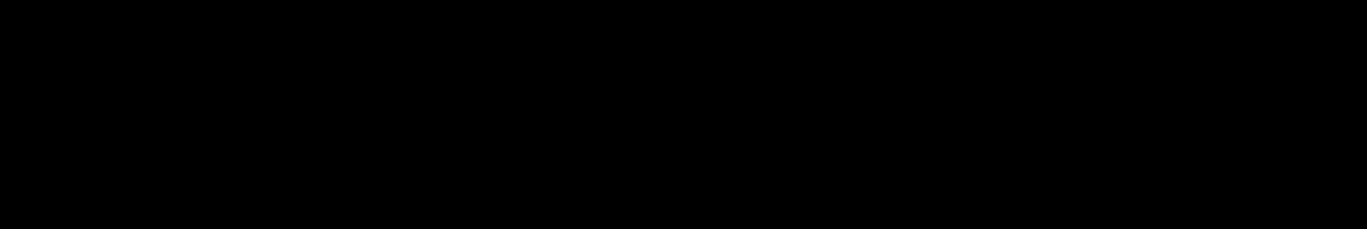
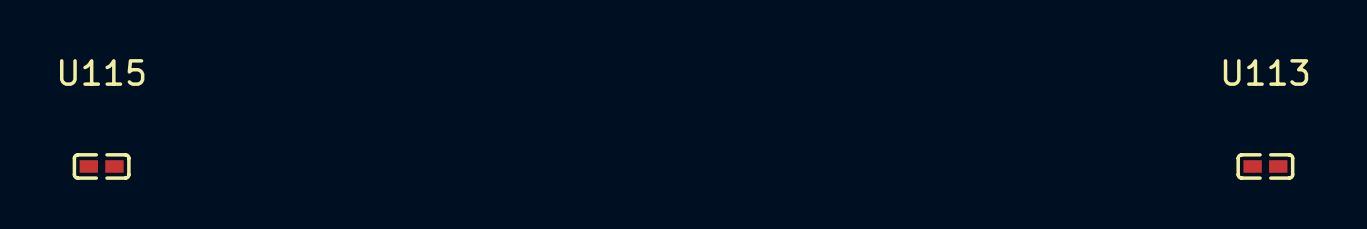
U115: none -> (101, 166)
U113: none -> (1265, 166)

